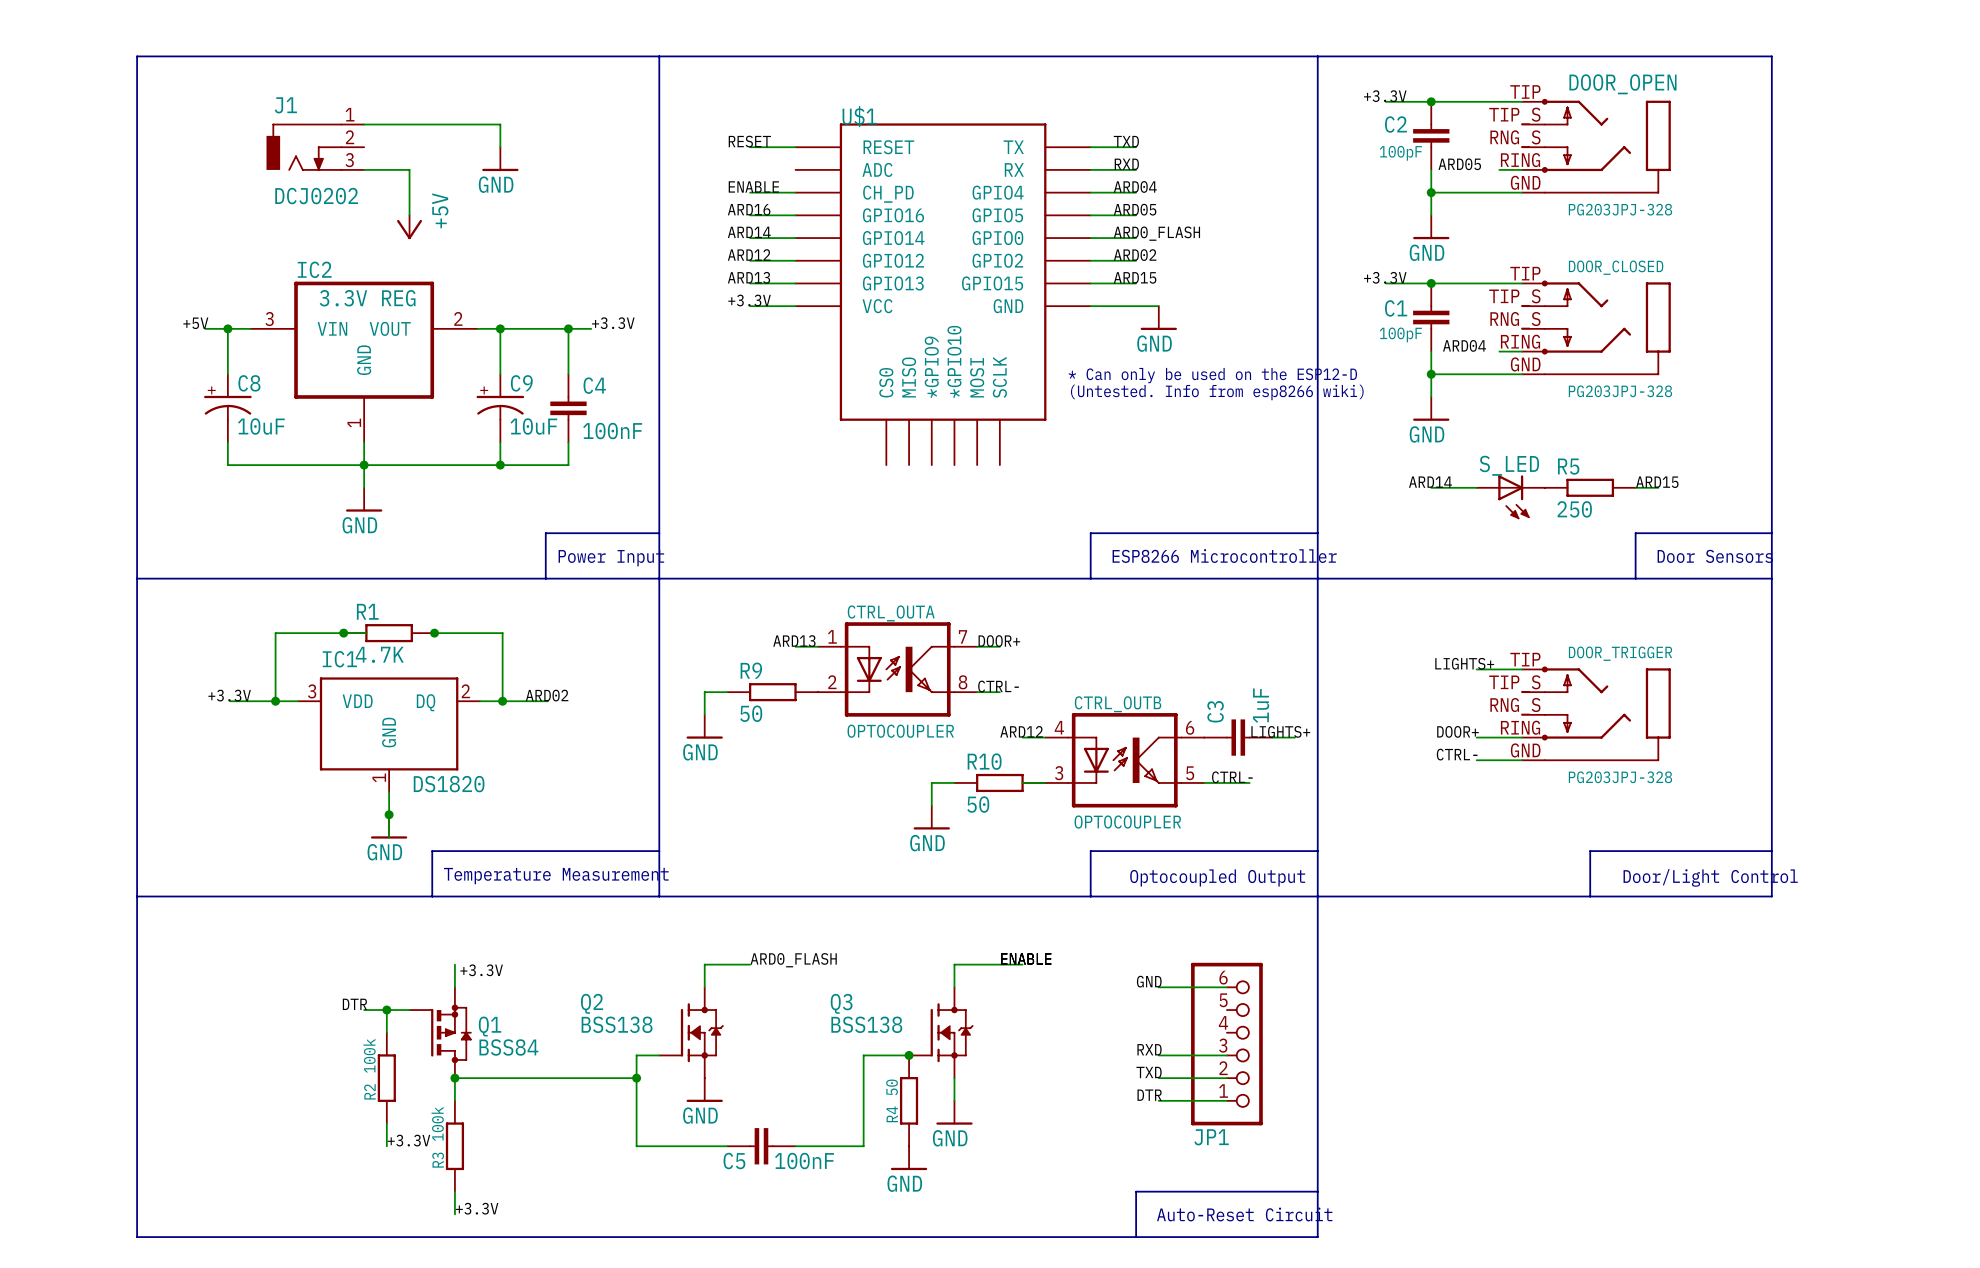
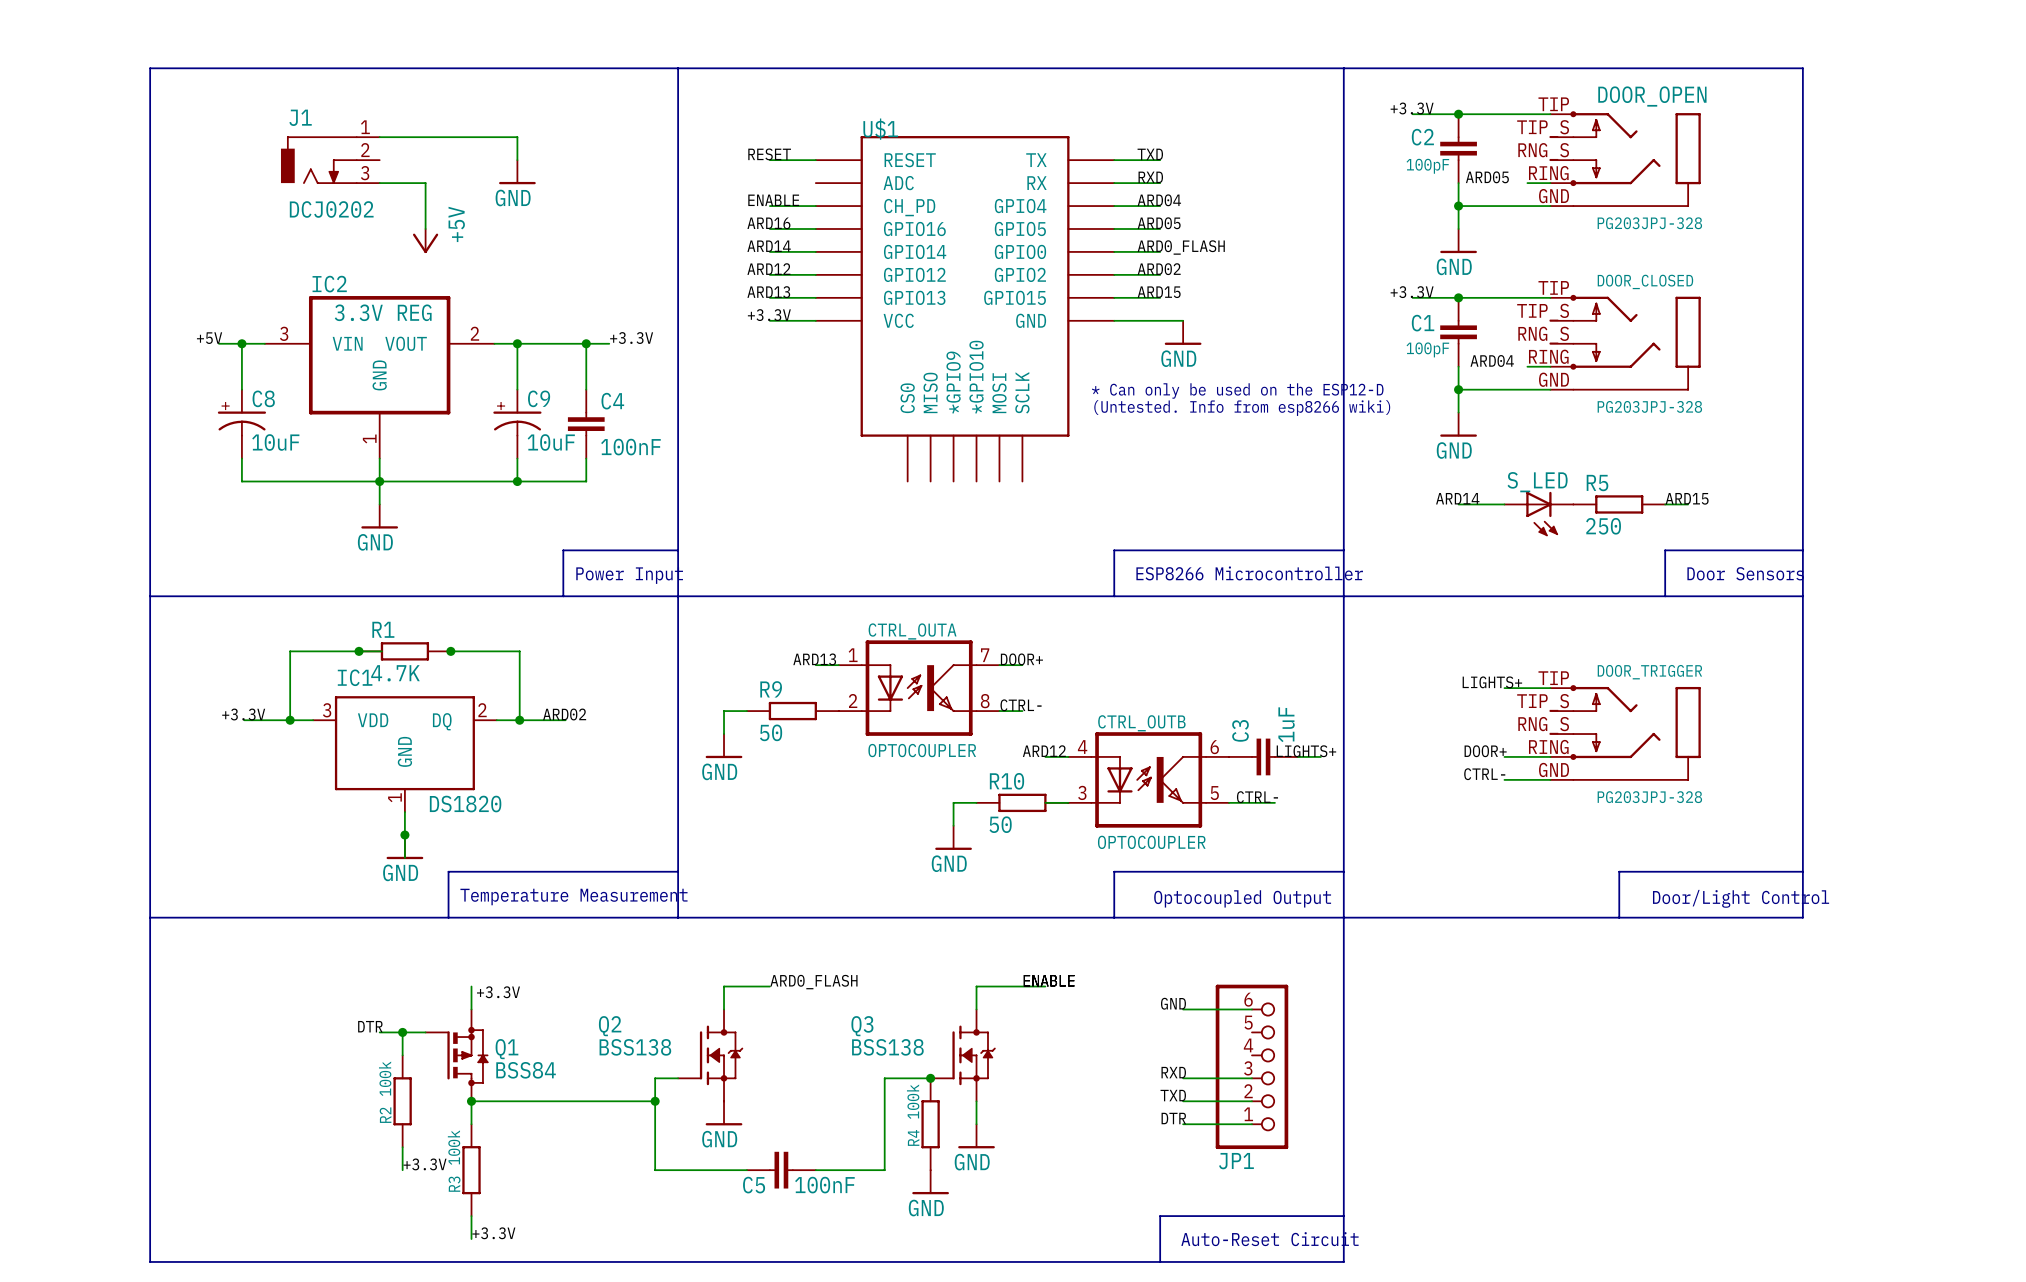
R4 value: 50 (892, 1087) -> 100k (913, 1101)

